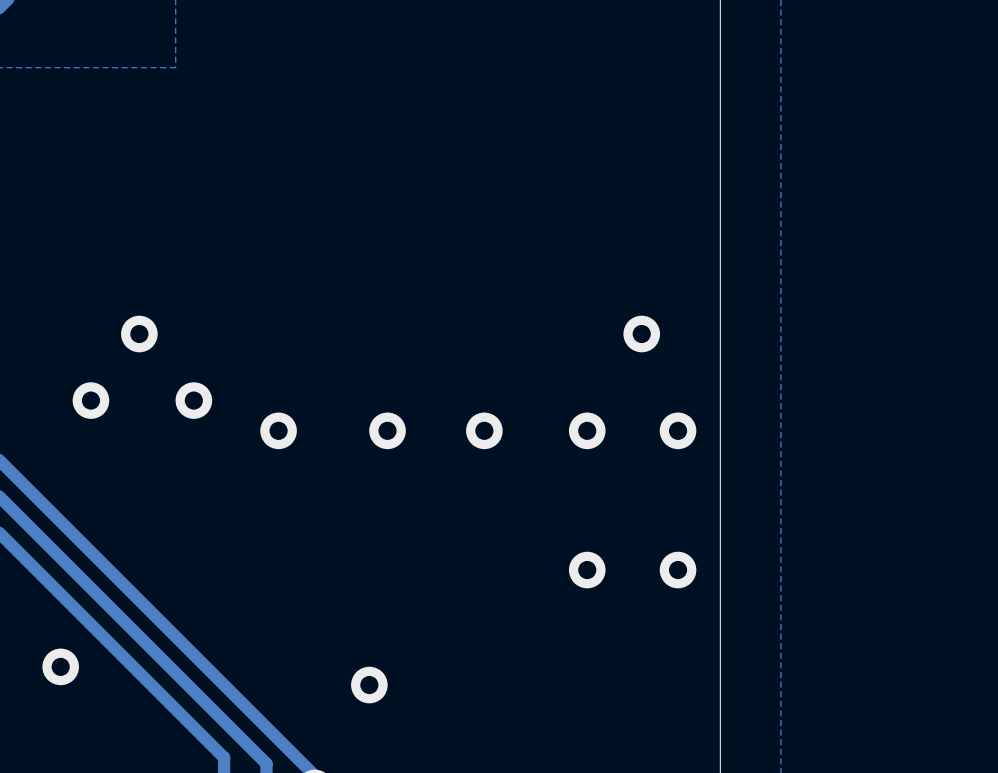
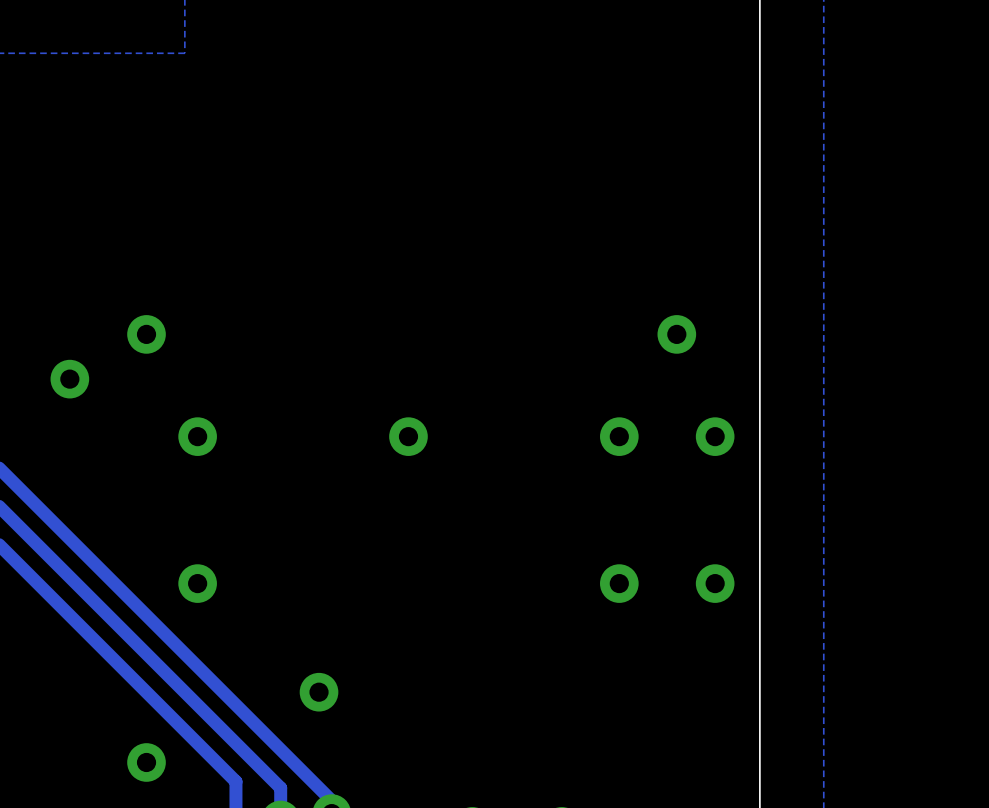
via position: (90, 400) -> (69, 379)
via position: (193, 400) -> (197, 436)
via: (278, 430) -> none
via: (484, 430) -> none
via: none -> (197, 583)
via: (60, 666) -> none
via position: (369, 685) -> (319, 692)
via: none -> (146, 762)

